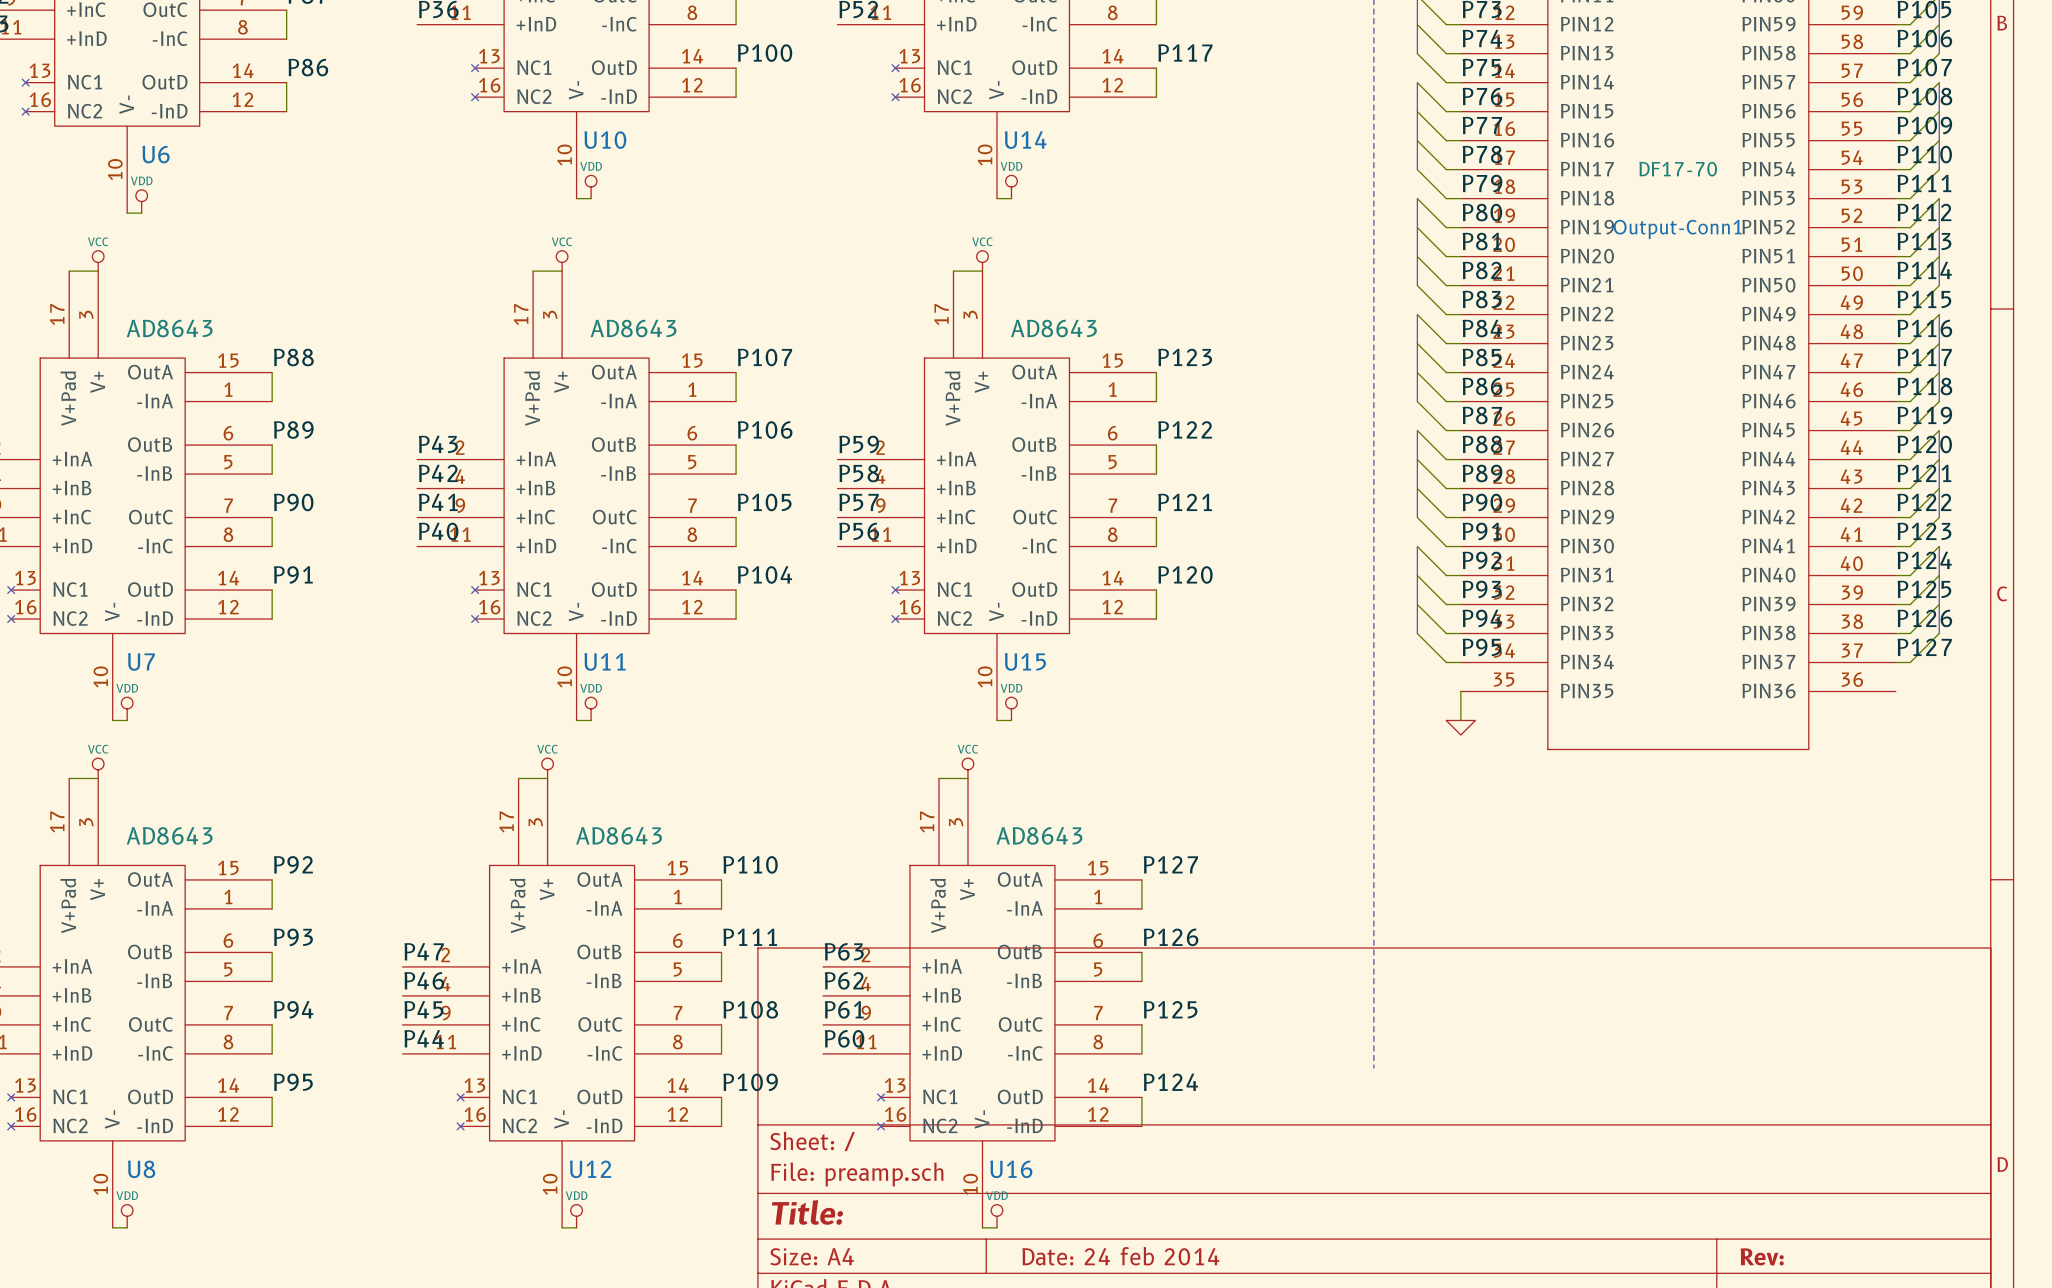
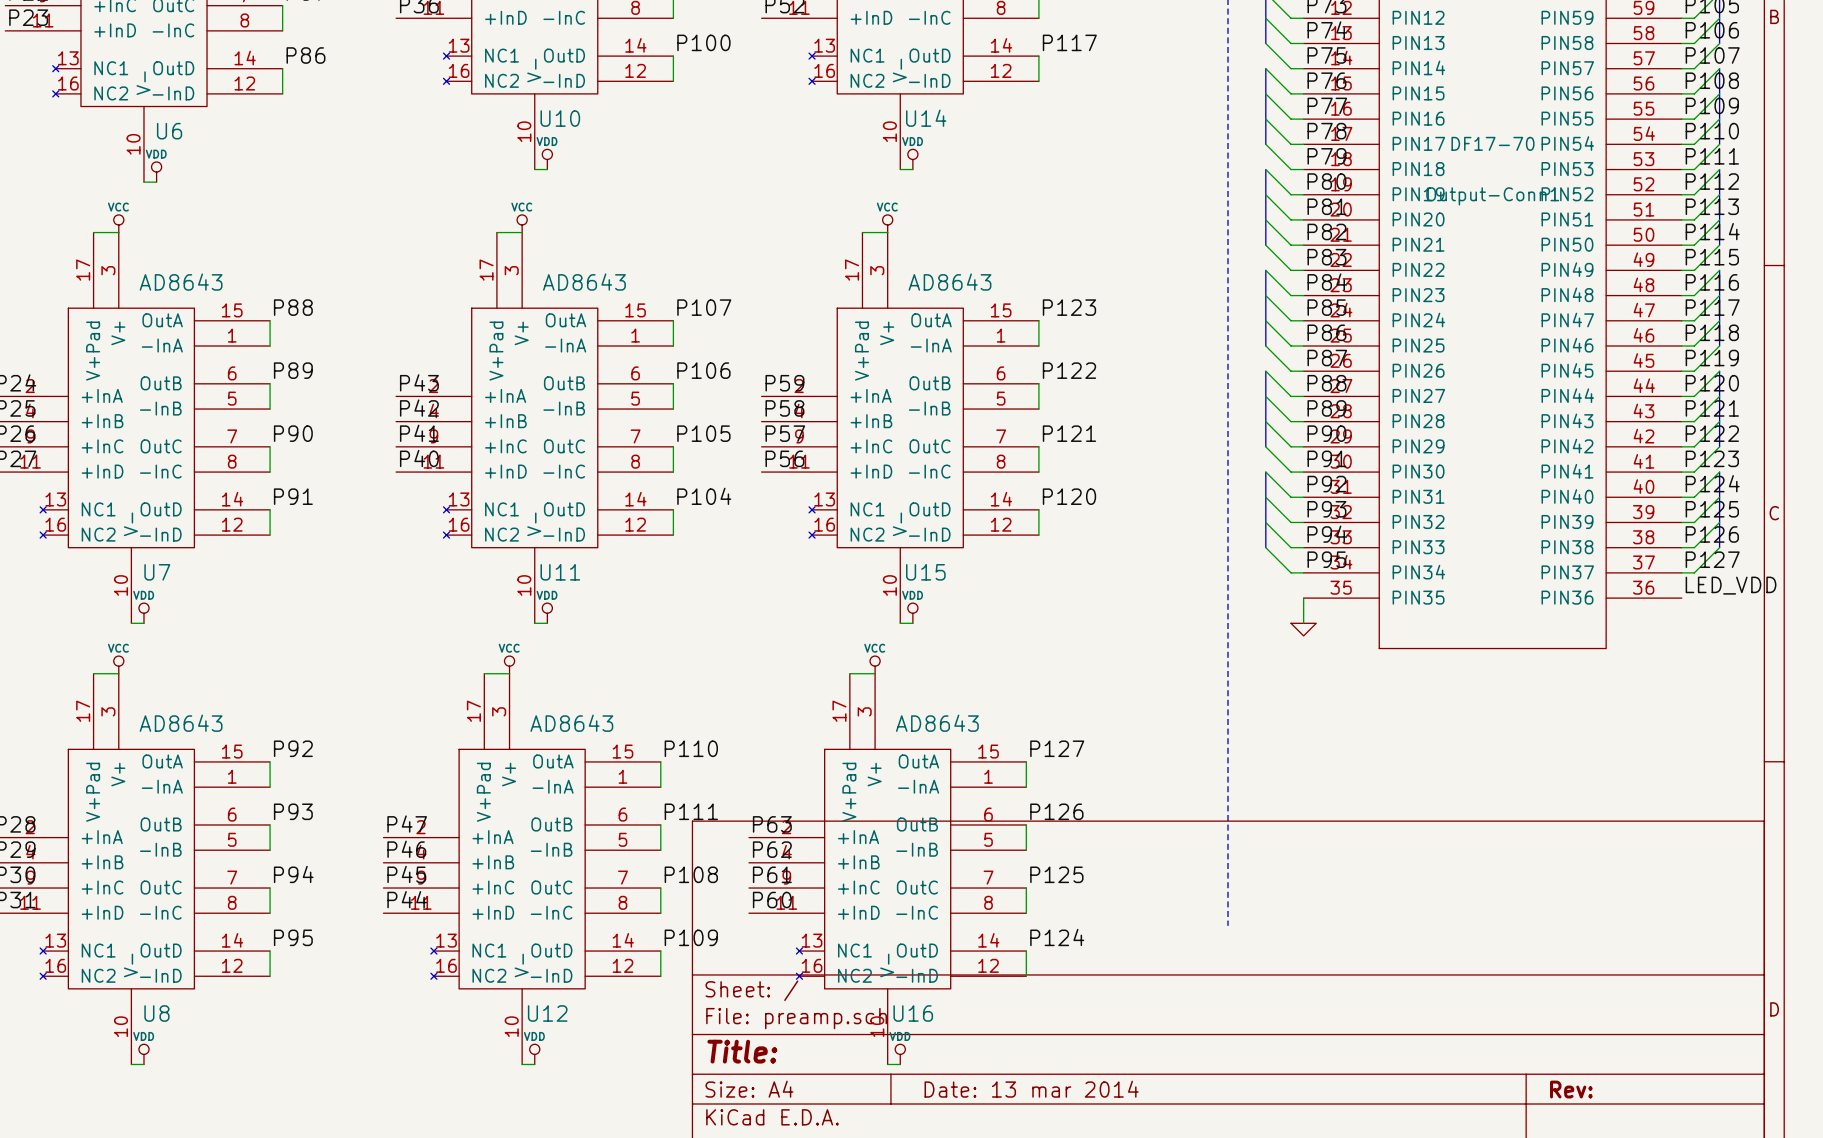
label: none -> LED_VDD (1731, 585)
title block: Date: 24 feb 2014 (1120, 1256) -> Date: 13 mar 2014 (1031, 1089)

